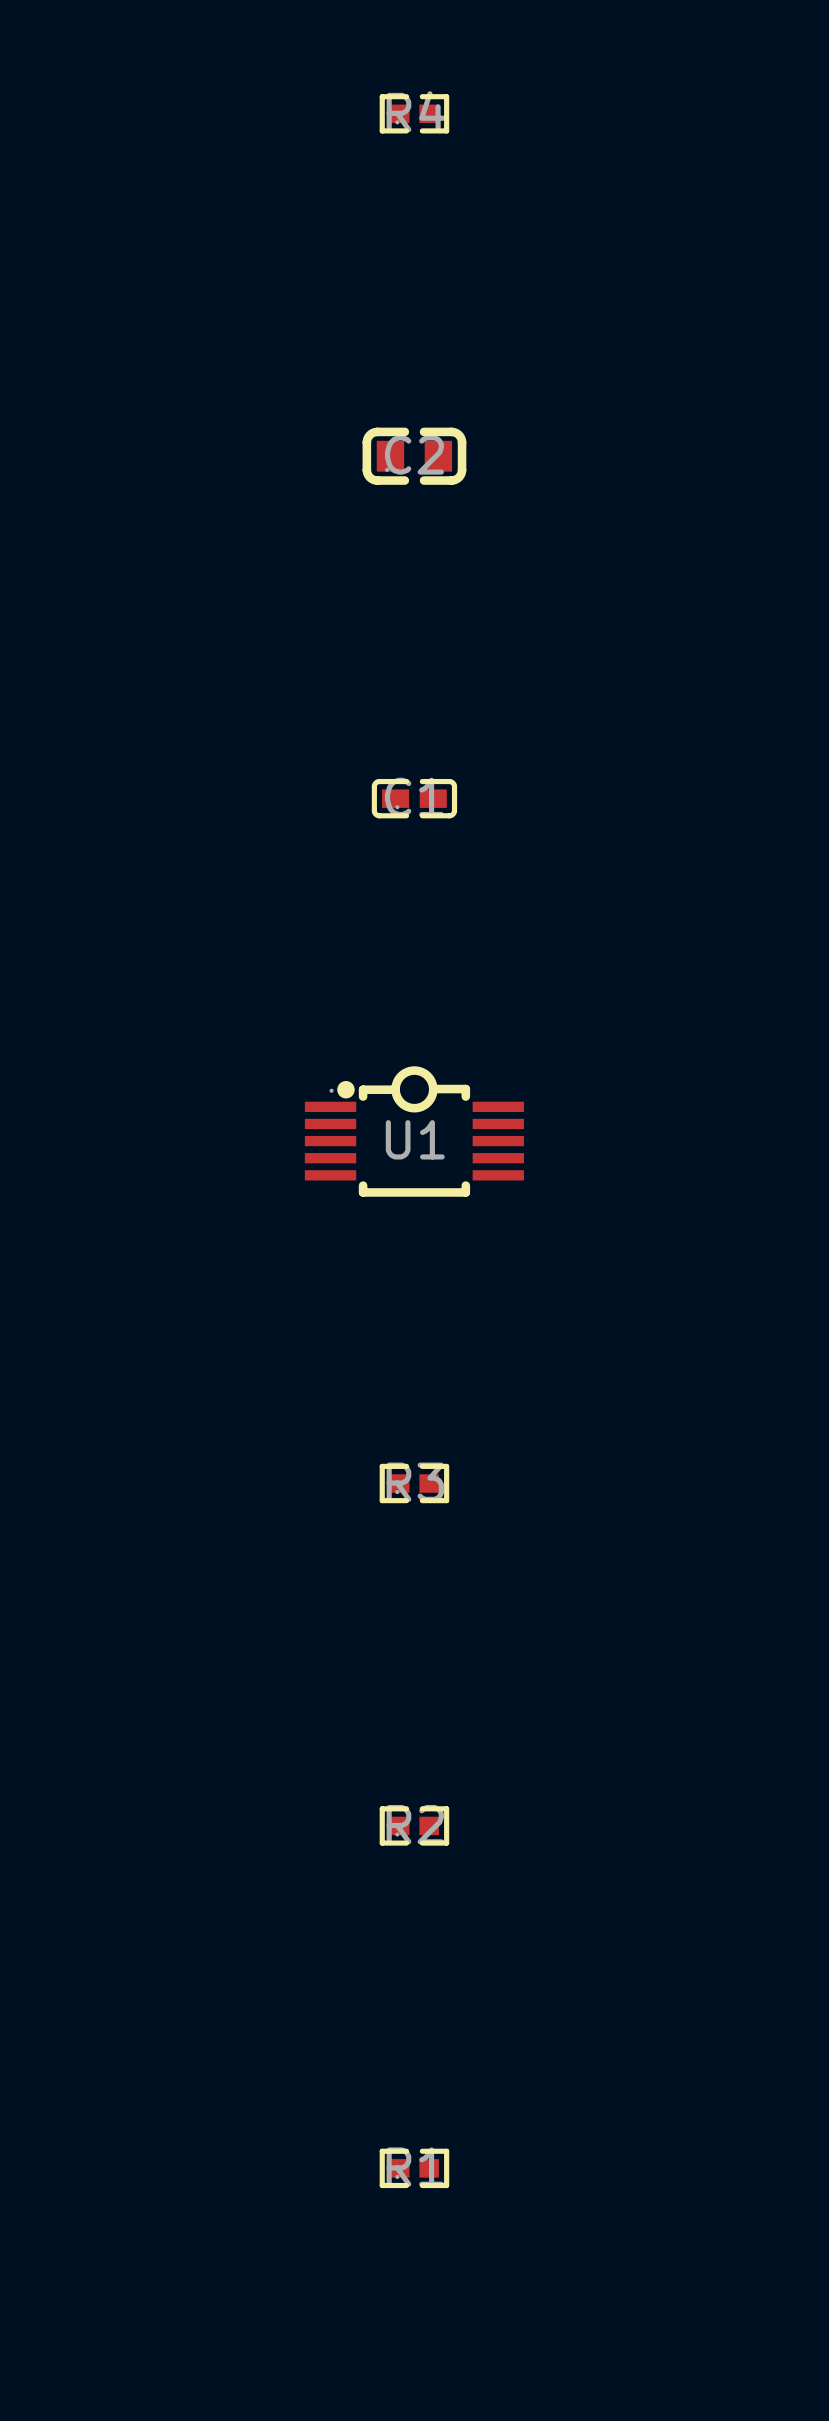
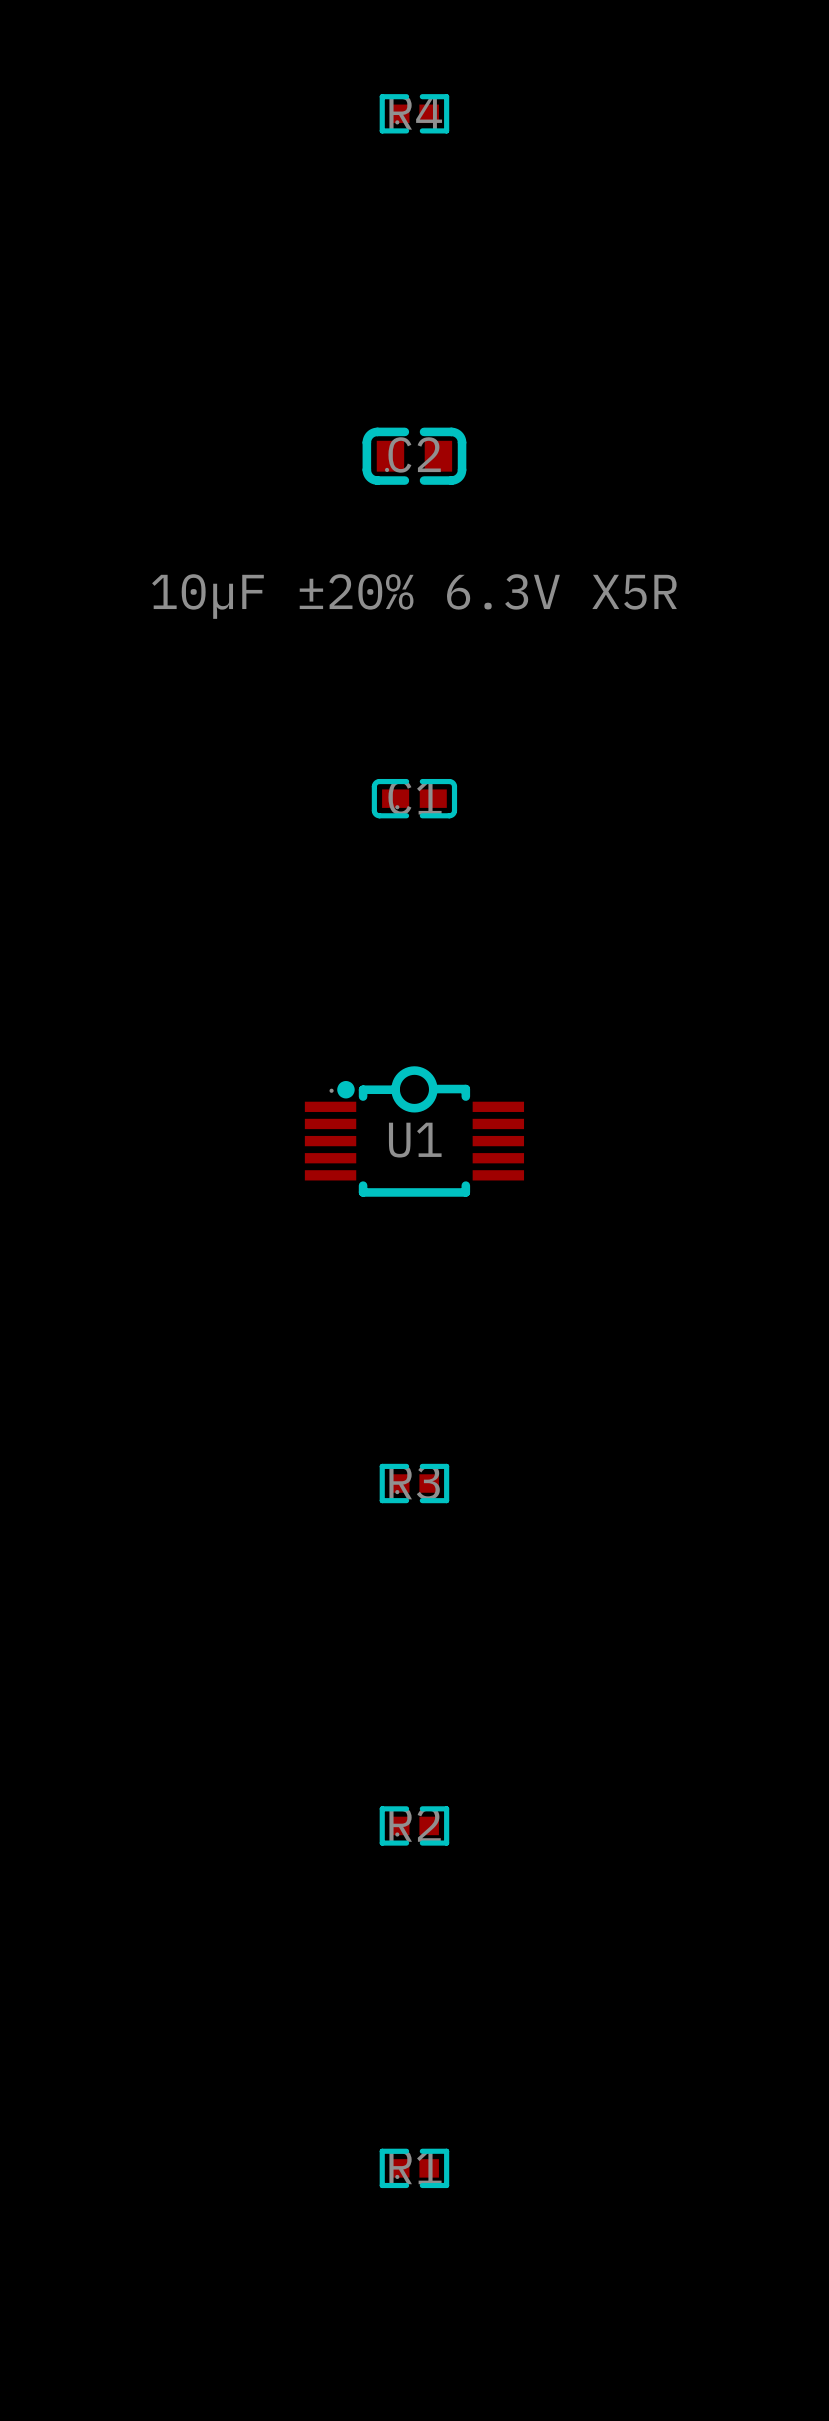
C2 value: none -> 10µF ±20% 6.3V X5R (414, 596)

